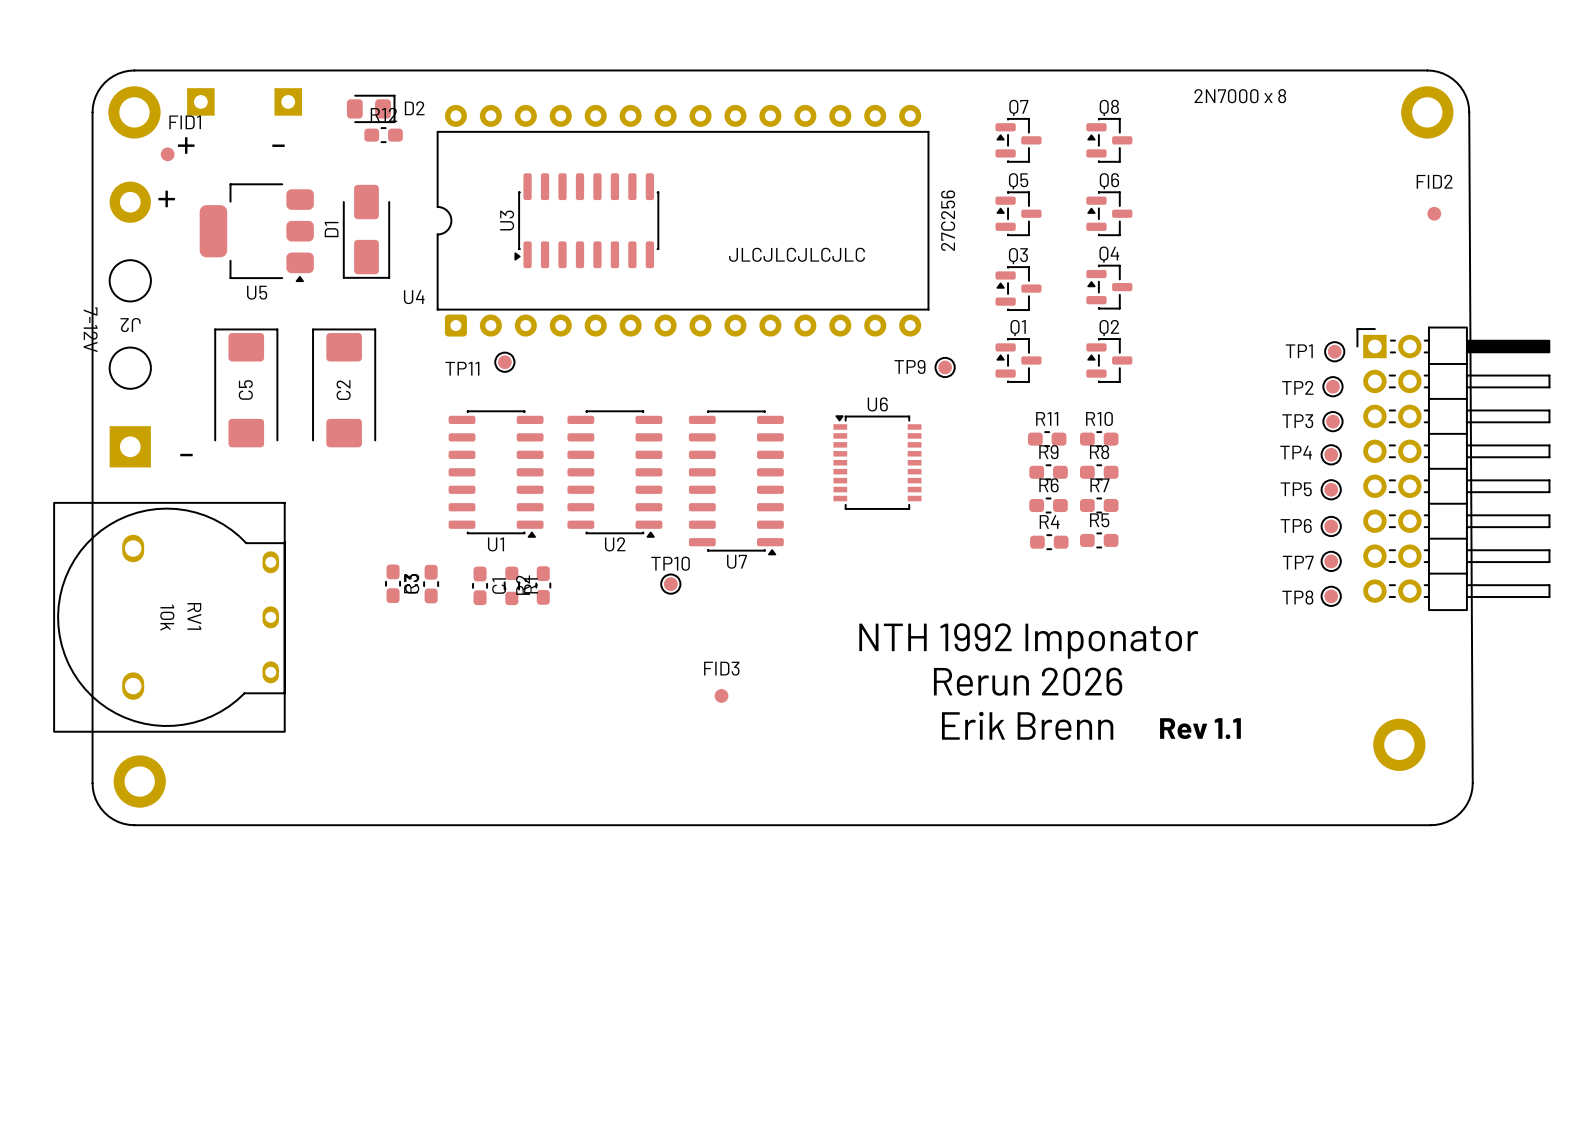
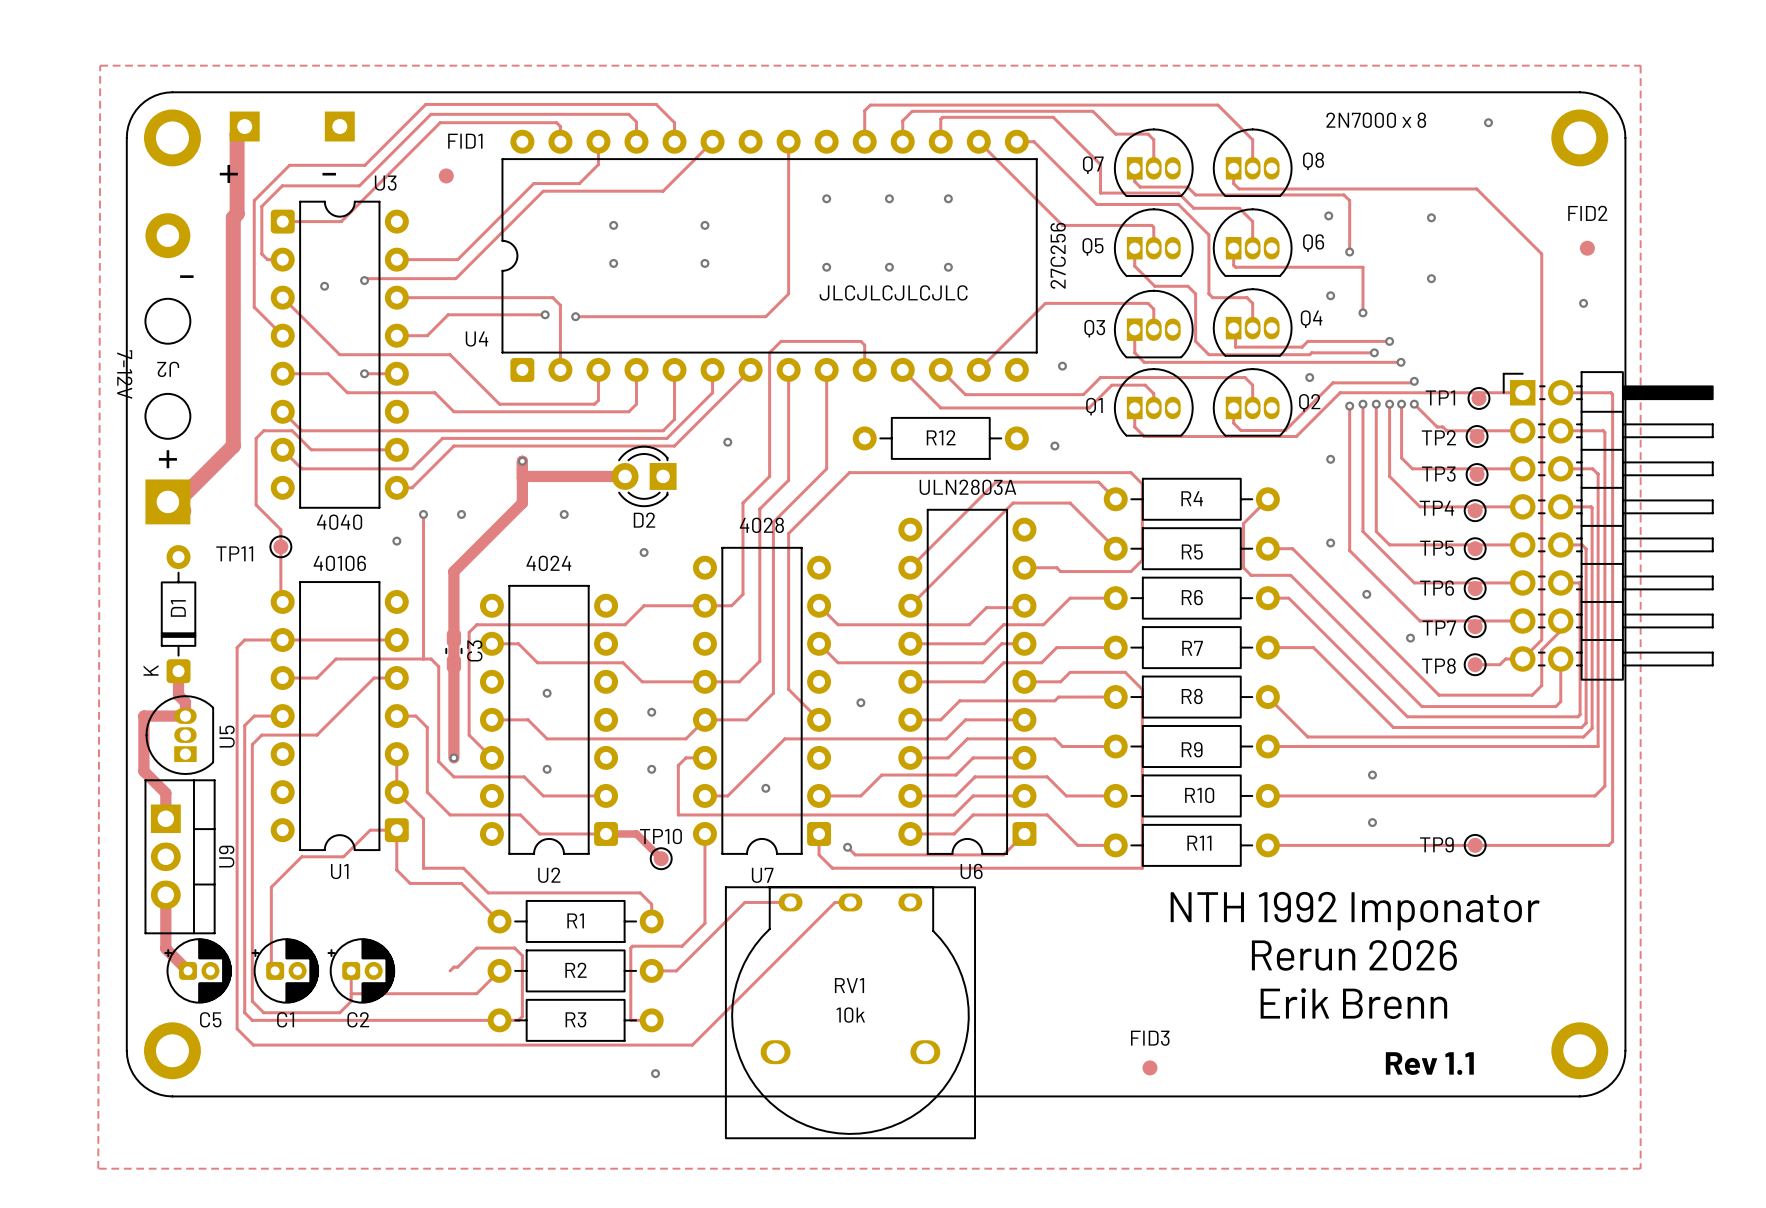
zone outline: none -> (100, 65) (1640, 65) (1640, 1168) (98, 1168) (100, 65)
D2 footprint: [346, 94, 396, 123] -> [611, 445, 677, 508]
via: none -> (1488, 122)
track: none -> (244, 126) (237, 134) (237, 213) (233, 217) (233, 446) (176, 503) (183, 510)
Q7 name position: Q7 (1018, 107) -> Q7 (1093, 165)
Q8 name position: Q8 (1109, 107) -> Q8 (1313, 161)
D2 name position: D2 (414, 108) -> D2 (644, 520)
board edge: (1469, 112) (1472, 783) (1471, 794) (1464, 808) (1446, 822) (1430, 825) (134, 825) (118, 822) (104, 812) (95, 799) (92, 783) -> (1625, 137) (1625, 1050) (1623, 1062) (1619, 1073) (1612, 1083) (1597, 1092) (1579, 1096) (166, 1096) (149, 1090) (140, 1083) (132, 1073) (127, 1056) (126, 868)
track: none -> (560, 141) (560, 126) (556, 122) (440, 122) (341, 221) (282, 221)
track: none -> (598, 141) (598, 164) (579, 183) (533, 183) (457, 259) (396, 259)
track: none -> (636, 141) (636, 122) (628, 114) (430, 114) (359, 185) (282, 185) (261, 206) (261, 253) (267, 259) (282, 259)
track: none -> (674, 141) (674, 122) (656, 104) (425, 104) (364, 165) (289, 165) (254, 200) (254, 307) (282, 335)
track: none -> (712, 141) (663, 191) (543, 191) (455, 278) (366, 278) (364, 280)
track: none -> (788, 141) (788, 293) (765, 316) (575, 316)
track: none -> (864, 141) (864, 110) (870, 105) (1217, 105) (1252, 139) (1252, 168)
track: none -> (902, 141) (902, 120) (912, 111) (1092, 111) (1115, 134) (1148, 134) (1153, 139) (1153, 168)
track: none -> (940, 141) (940, 119) (942, 117) (1053, 117) (1100, 164) (1100, 193) (1178, 193) (1193, 208) (1239, 208) (1252, 221) (1252, 248)
track: none -> (978, 141) (1062, 225) (1151, 225) (1153, 227) (1153, 248)
track: none -> (1016, 141) (1033, 141) (1096, 204) (1178, 204) (1208, 234) (1208, 293) (1212, 297) (1246, 297) (1252, 303) (1252, 328)
Q7 footprint: [995, 118, 1042, 163] -> [1113, 128, 1194, 197]
Q8 footprint: [1086, 118, 1133, 163] -> [1212, 128, 1293, 197]
R12 footprint: [364, 127, 403, 143] -> [852, 416, 1029, 460]
track: none -> (1134, 168) (1134, 181) (1140, 187) (1187, 187) (1195, 194) (1343, 194) (1349, 200) (1349, 252)
track: none -> (1233, 168) (1233, 183) (1239, 188) (1476, 188) (1541, 253) (1541, 640) (1522, 659) (1505, 659) (1499, 664) (1475, 664)
FID1 position: (167, 154) -> (446, 175)
via: none -> (826, 198)
via: none -> (889, 198)
via: none -> (948, 198)
U3 footprint: [514, 173, 660, 269] -> [270, 200, 409, 509]
Q5 name position: Q5 (1018, 181) -> Q5 (1093, 246)
Q6 name position: Q6 (1109, 181) -> Q6 (1313, 243)
U5 footprint: [199, 183, 314, 283] -> [145, 695, 215, 775]
D1 footprint: [342, 184, 391, 279] -> [160, 545, 197, 684]
via: none -> (1328, 215)
via: none -> (1431, 217)
Q5 footprint: [995, 191, 1042, 237] -> [1113, 208, 1194, 277]
Q6 footprint: [1086, 191, 1133, 237] -> [1212, 208, 1293, 277]
via: none -> (613, 225)
via: none -> (704, 225)
text position: + (166, 198) -> + (167, 459)
track: none -> (1134, 248) (1134, 266) (1154, 286) (1188, 286) (1195, 293) (1195, 341) (1208, 354) (1374, 352)
track: none -> (1233, 248) (1233, 265) (1235, 267) (1362, 267) (1362, 312)
via: none -> (1349, 252)
U3 name position: U3 (507, 220) -> U3 (385, 183)
via: none -> (613, 263)
via: none -> (704, 263)
D1 name position: D1 (331, 229) -> D1 (178, 608)
via: none -> (826, 267)
via: none -> (889, 267)
via: none -> (948, 267)
via: none -> (1431, 278)
via: none -> (364, 280)
via: none -> (324, 286)
Q4 name position: Q4 (1109, 254) -> Q4 (1311, 319)
Q3 name position: Q3 (1018, 256) -> Q3 (1094, 328)
via: none -> (1330, 295)
track: none -> (282, 297) (339, 354) (450, 354) (499, 404) (594, 404) (598, 400) (598, 369)
track: none -> (396, 297) (552, 297) (560, 305) (560, 369)
Q4 footprint: [1086, 264, 1133, 310] -> [1212, 288, 1293, 357]
via: none -> (1583, 303)
Q3 footprint: [995, 266, 1042, 311] -> [1113, 289, 1194, 359]
via: none -> (1362, 312)
track: none -> (545, 314) (448, 314) (427, 335) (396, 335)
via: none -> (545, 314)
via: none -> (575, 316)
track: none -> (1233, 328) (1235, 330) (1235, 347) (1302, 347) (1307, 341) (1389, 341)
track: none -> (1153, 329) (1153, 309) (1148, 303) (1045, 303) (978, 369)
U5 name position: U5 (257, 292) -> U5 (227, 736)
track: none -> (1134, 335) (1134, 352) (1144, 362) (1401, 362)
via: none -> (1389, 341)
via: none -> (1374, 352)
via: none -> (1401, 362)
via: none -> (1062, 366)
track: none -> (636, 369) (636, 404) (628, 411) (453, 411) (434, 392) (347, 392) (328, 373) (282, 373)
track: none -> (674, 369) (674, 419) (663, 430) (301, 430) (282, 411)
track: none -> (712, 369) (712, 392) (666, 438) (442, 438) (412, 468) (301, 468) (282, 449)
track: none -> (750, 369) (674, 446) (453, 446) (412, 487) (396, 487)
track: none -> (788, 369) (788, 480) (759, 509) (759, 661) (739, 681) (642, 681) (623, 662) (537, 662) (518, 643) (491, 643)
track: none -> (826, 369) (826, 468) (773, 522) (773, 693) (746, 719) (704, 719) (685, 738) (547, 738) (528, 719) (491, 719)
track: none -> (864, 369) (864, 345) (860, 341) (781, 341) (769, 352) (769, 476) (742, 503) (742, 594) (731, 605) (644, 605) (625, 624) (476, 624) (469, 632) (469, 735) (491, 757)
track: none -> (902, 369) (940, 407) (1089, 407) (1111, 385) (1145, 385) (1153, 393) (1153, 407)
track: none -> (940, 369) (965, 394) (1083, 394) (1100, 377) (1245, 377) (1252, 385) (1252, 407)
C5 footprint: [214, 328, 279, 448] -> [164, 938, 232, 1004]
C2 footprint: [312, 328, 377, 448] -> [327, 938, 396, 1004]
Q1 name position: Q1 (1018, 328) -> Q1 (1094, 406)
Q2 name position: Q2 (1109, 328) -> Q2 (1309, 402)
track: none -> (364, 373) (396, 373)
via: none -> (364, 373)
via: none -> (1309, 377)
track: none -> (1414, 381) (1332, 382) (1285, 430) (1240, 430) (1233, 423) (1233, 407)
via: none -> (1414, 381)
Q1 footprint: [995, 338, 1042, 383] -> [1113, 368, 1194, 437]
Q2 footprint: [1086, 338, 1133, 383] -> [1212, 368, 1293, 437]
track: none -> (1522, 392) (1340, 392) (1296, 436) (1144, 436) (1134, 427) (1134, 407)
track: none -> (1560, 392) (1610, 392) (1612, 394) (1612, 841) (1608, 845) (1267, 845)
track: none -> (1362, 404) (1362, 531) (1414, 582) (1522, 582)
via: none -> (1362, 404)
track: none -> (1376, 404) (1376, 531) (1389, 544) (1522, 544)
via: none -> (1376, 404)
track: none -> (1389, 404) (1389, 476) (1420, 506) (1522, 506)
via: none -> (1389, 404)
track: none -> (1401, 404) (1401, 457) (1412, 468) (1522, 468)
via: none -> (1401, 404)
track: none -> (1414, 404) (1437, 427) (1442, 427) (1446, 430) (1522, 430)
via: none -> (1414, 404)
track: none -> (1349, 406) (1349, 550) (1420, 620) (1522, 620)
via: none -> (1349, 406)
TP11 position: (504, 362) -> (280, 546)
TP9 position: (945, 367) -> (1475, 845)
track: none -> (1560, 430) (1604, 432) (1604, 786) (1594, 795) (1267, 795)
C5 name position: C5 (245, 389) -> C5 (210, 1019)
C2 name position: C2 (343, 390) -> C2 (358, 1019)
via: none -> (727, 442)
via: none -> (1054, 446)
track: none -> (396, 449) (311, 449) (292, 430) (263, 430) (256, 438) (256, 504) (280, 529) (280, 600) (282, 601)
U6 name position: U6 (877, 404) -> U6 (971, 871)
via: none -> (1330, 459)
track: none -> (522, 461) (522, 503) (453, 571) (453, 757)
via: none -> (522, 461)
U1 footprint: [448, 410, 544, 538] -> [270, 581, 409, 851]
U2 footprint: [567, 410, 663, 538] -> [479, 584, 619, 855]
U7 footprint: [688, 410, 784, 556] -> [692, 546, 832, 855]
U6 footprint: [833, 415, 922, 510] -> [898, 508, 1037, 855]
track: none -> (1560, 468) (1592, 468) (1597, 474)
track: none -> (1598, 474) (1598, 746) (1267, 746)
track: none -> (625, 476) (524, 476) (522, 478)
R11 footprint: [1027, 431, 1067, 447] -> [1103, 823, 1280, 867]
R10 footprint: [1079, 431, 1119, 447] -> [1103, 774, 1280, 818]
U6 value: none -> ULN2803A (967, 487)
track: none -> (1115, 499) (1098, 482) (995, 482) (910, 567)
track: none -> (1267, 499) (1243, 523) (1243, 567) (1251, 575) (1290, 575) (1421, 706) (1555, 706) (1560, 701) (1560, 659)
track: none -> (1560, 506) (1592, 507) (1592, 728) (1583, 736) (1307, 736) (1267, 697)
text position: - (186, 455) -> - (186, 276)
track: none -> (423, 514) (423, 659)
via: none -> (423, 514)
via: none -> (461, 514)
via: none -> (564, 514)
R9 footprint: [1029, 464, 1068, 481] -> [1103, 725, 1280, 768]
R8 footprint: [1079, 464, 1119, 481] -> [1103, 675, 1280, 719]
U3 value: none -> 4040 (339, 522)
U7 value: none -> 4028 (761, 525)
via: none -> (396, 541)
via: none -> (1330, 543)
track: none -> (1560, 544) (1582, 544) (1586, 548) (1586, 723) (1581, 727) (1393, 727) (1313, 647) (1267, 647)
track: none -> (1115, 548) (1070, 503) (1013, 503) (910, 605)
track: none -> (1267, 548) (1292, 548) (1439, 695) (1532, 695) (1541, 685) (1541, 649) (1560, 630) (1560, 620)
via: none -> (644, 552)
R6 footprint: [1029, 497, 1068, 514] -> [1103, 576, 1280, 620]
R7 footprint: [1079, 497, 1119, 514] -> [1103, 626, 1280, 670]
U1 value: none -> 40106 (339, 563)
U2 value: none -> 4024 (548, 563)
track: none -> (1024, 567) (1056, 567) (1060, 571) (1130, 571) (1142, 560) (1142, 484) (1130, 472) (849, 472) (788, 533) (788, 689) (819, 719)
track: none -> (1560, 582) (1580, 582) (1580, 714) (1578, 716) (1407, 716) (1288, 598) (1267, 598)
via: none -> (1366, 594)
R5 footprint: [1079, 532, 1119, 549] -> [1103, 527, 1280, 571]
R4 footprint: [1030, 534, 1069, 551] -> [1103, 477, 1280, 521]
track: none -> (1115, 598) (1070, 598) (1043, 624) (1003, 624) (984, 643) (910, 643)
track: none -> (819, 605) (838, 624) (969, 624) (986, 607) (1022, 607) (1024, 605)
U1 name position: U1 (496, 544) -> U1 (339, 871)
U2 name position: U2 (615, 544) -> U2 (549, 875)
U7 name position: U7 (736, 561) -> U7 (762, 875)
R3 footprint: [423, 564, 439, 604] -> [487, 998, 664, 1042]
C1 footprint: [472, 566, 488, 606] -> [251, 938, 320, 1004]
R1 footprint: [503, 566, 520, 606] -> [487, 900, 664, 943]
R2 footprint: [535, 566, 552, 605] -> [487, 949, 664, 993]
via: none -> (1410, 638)
track: none -> (396, 640) (244, 640) (237, 647) (237, 1028) (253, 1045) (692, 1045) (835, 902) (850, 902)
track: none -> (819, 643) (838, 662) (982, 662) (1001, 643) (1024, 643)
track: none -> (1115, 647) (1056, 647) (1041, 662) (1003, 662) (984, 681) (910, 681)
TP10 position: (670, 584) -> (661, 858)
C1 name position: C1 (499, 586) -> C1 (285, 1019)
track: none -> (183, 676) (178, 671) (178, 695) (185, 702) (185, 716)
track: none -> (282, 678) (316, 678) (336, 659) (431, 659) (438, 666) (438, 761) (453, 776) (524, 776) (543, 795) (606, 795)
track: none -> (396, 678) (374, 678) (316, 735) (261, 735) (252, 744) (252, 1001) (263, 1012) (339, 1012) (351, 1001) (351, 970)
track: none -> (1024, 681) (1060, 681) (1070, 672) (1125, 672) (1142, 689) (1142, 868) (832, 868) (819, 854) (819, 833)
RV1 rotation: 0° (169, 617) -> 90° counterclockwise (850, 1012)
RV1 position: (169, 617) -> (850, 1012)
via: none -> (547, 693)
track: none -> (1115, 697) (1058, 697) (1054, 700) (959, 700) (940, 719) (910, 719)
via: none -> (860, 702)
via: none -> (651, 712)
text position: NTH 1992 Imponator (1028, 641) -> NTH 1992 Imponator (1355, 911)
track: none -> (185, 716) (143, 716) (143, 771) (165, 793) (165, 818)
track: none -> (282, 716) (254, 716) (244, 725) (244, 1012) (252, 1020) (518, 1020) (522, 1016) (522, 955) (514, 948) (476, 948) (457, 967) (453, 967) (450, 970)
track: none -> (396, 716) (415, 716) (427, 727) (427, 792) (450, 814) (520, 814) (539, 833) (636, 833) (659, 856)
track: none -> (1024, 719) (965, 719) (946, 738) (784, 738) (727, 795) (704, 795)
track: none -> (1115, 746) (1062, 746) (1054, 738) (967, 738) (948, 757) (910, 757)
track: none -> (396, 754) (396, 792) (423, 818) (423, 868) (463, 868) (488, 892) (640, 892) (651, 904) (651, 921)
via: none -> (453, 757)
track: none -> (704, 757) (685, 757) (678, 765) (678, 814) (954, 814) (973, 795) (1024, 795)
track: none -> (1024, 757) (973, 757) (955, 775) (881, 775) (860, 795) (819, 795)
text position: Rerun 2026 (1028, 681) -> Rerun 2026 (1354, 955)
via: none -> (547, 769)
via: none -> (651, 769)
FID3 position: (721, 695) -> (1149, 1067)
via: none -> (1372, 775)
via: none -> (765, 788)
track: none -> (910, 795) (955, 795) (975, 776) (1047, 776) (1066, 795) (1115, 795)
text position: Erik Brenn (1027, 725) -> Erik Brenn (1353, 1003)
text position: Rev 1.1 (1200, 728) -> Rev 1.1 (1429, 1063)
via: none -> (1372, 822)
part position: (1399, 744) -> (1579, 1050)
track: none -> (704, 833) (704, 923) (682, 946) (632, 946) (630, 948) (630, 1020) (651, 1020)
track: none -> (910, 833) (954, 833) (973, 814) (1047, 814) (1077, 845) (1115, 845)
track: none -> (1024, 833) (1003, 854) (855, 854) (847, 847)
via: none -> (847, 847)
U9: none -> (180, 856)
part position: (139, 781) -> (172, 1050)
track: none -> (165, 894) (165, 948) (188, 970)
track: none -> (790, 902) (744, 902) (676, 970) (651, 970)
track: none -> (499, 921) (461, 883) (410, 883) (396, 870) (396, 830) (370, 830) (343, 856) (301, 856) (271, 887) (271, 963) (275, 967) (275, 970)
track: none -> (499, 970) (476, 993) (351, 993)
via: none -> (655, 1073)

